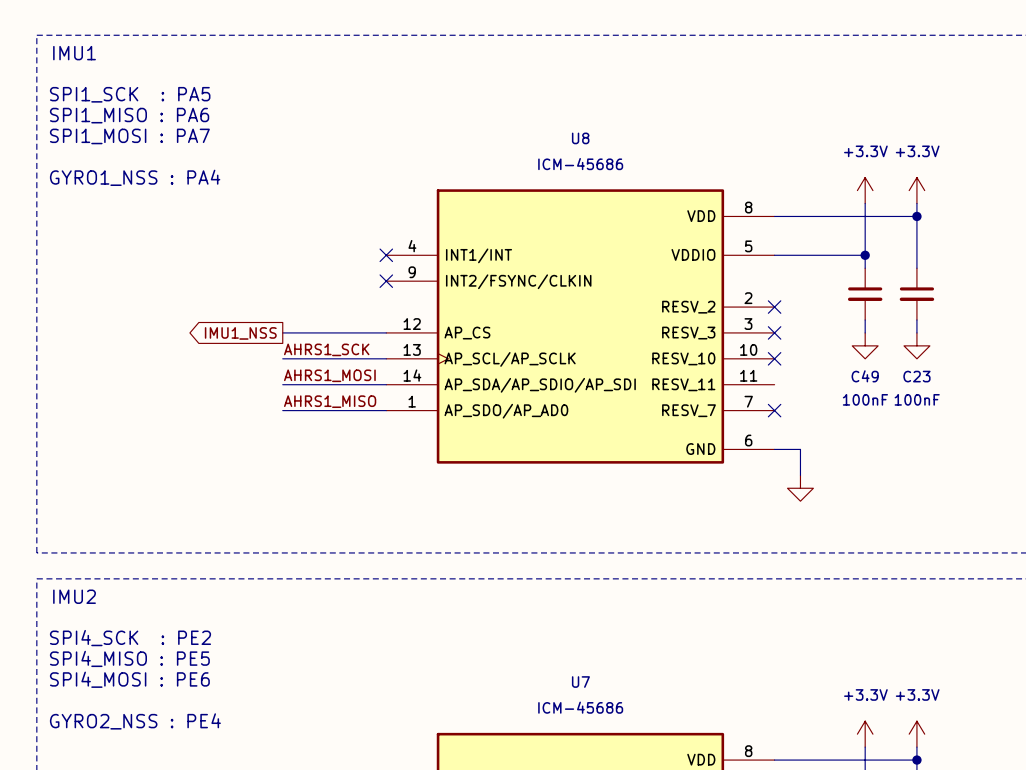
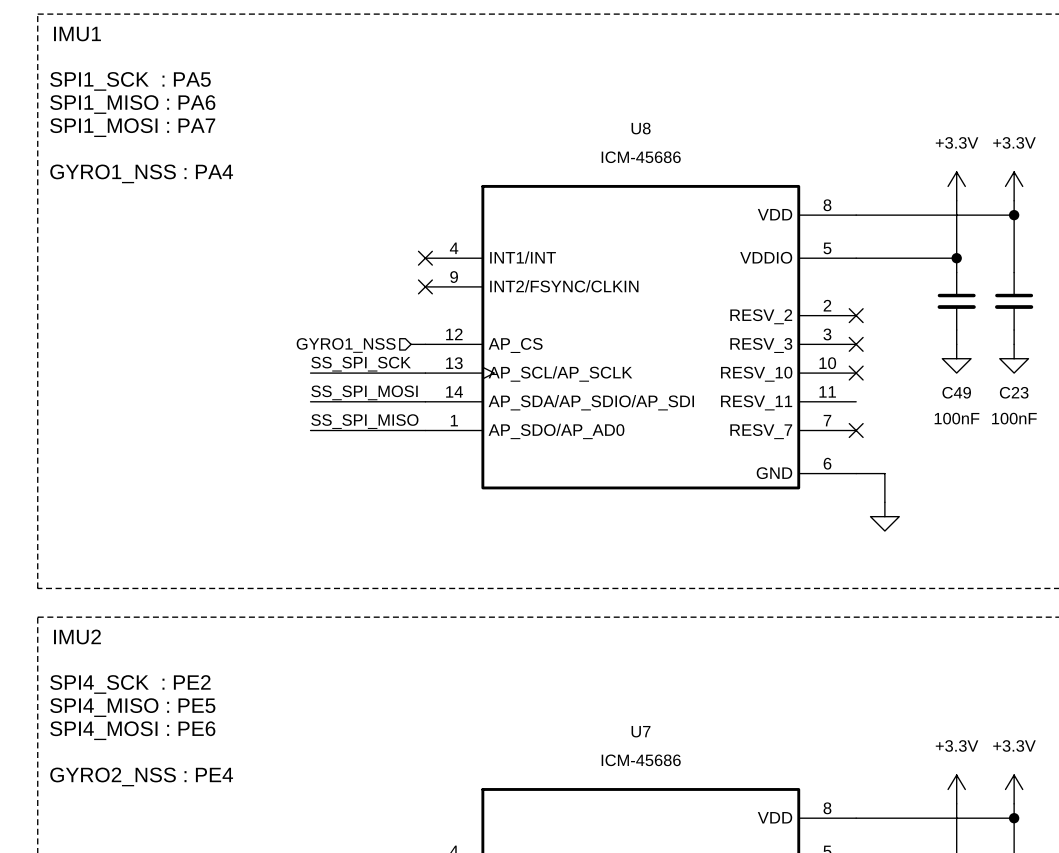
wire: (282, 332) (373, 332) -> none
global label: IMU1_NSS (240, 333) -> none
hierarchical label: none -> GYRO1_NSS (346, 345)
label: AHRS1_SCK (326, 349) -> SS_SPI_SCK (361, 364)
label: AHRS1_MOSI (329, 375) -> SS_SPI_MOSI (364, 392)
label: AHRS1_MISO (330, 401) -> SS_SPI_MISO (364, 421)

